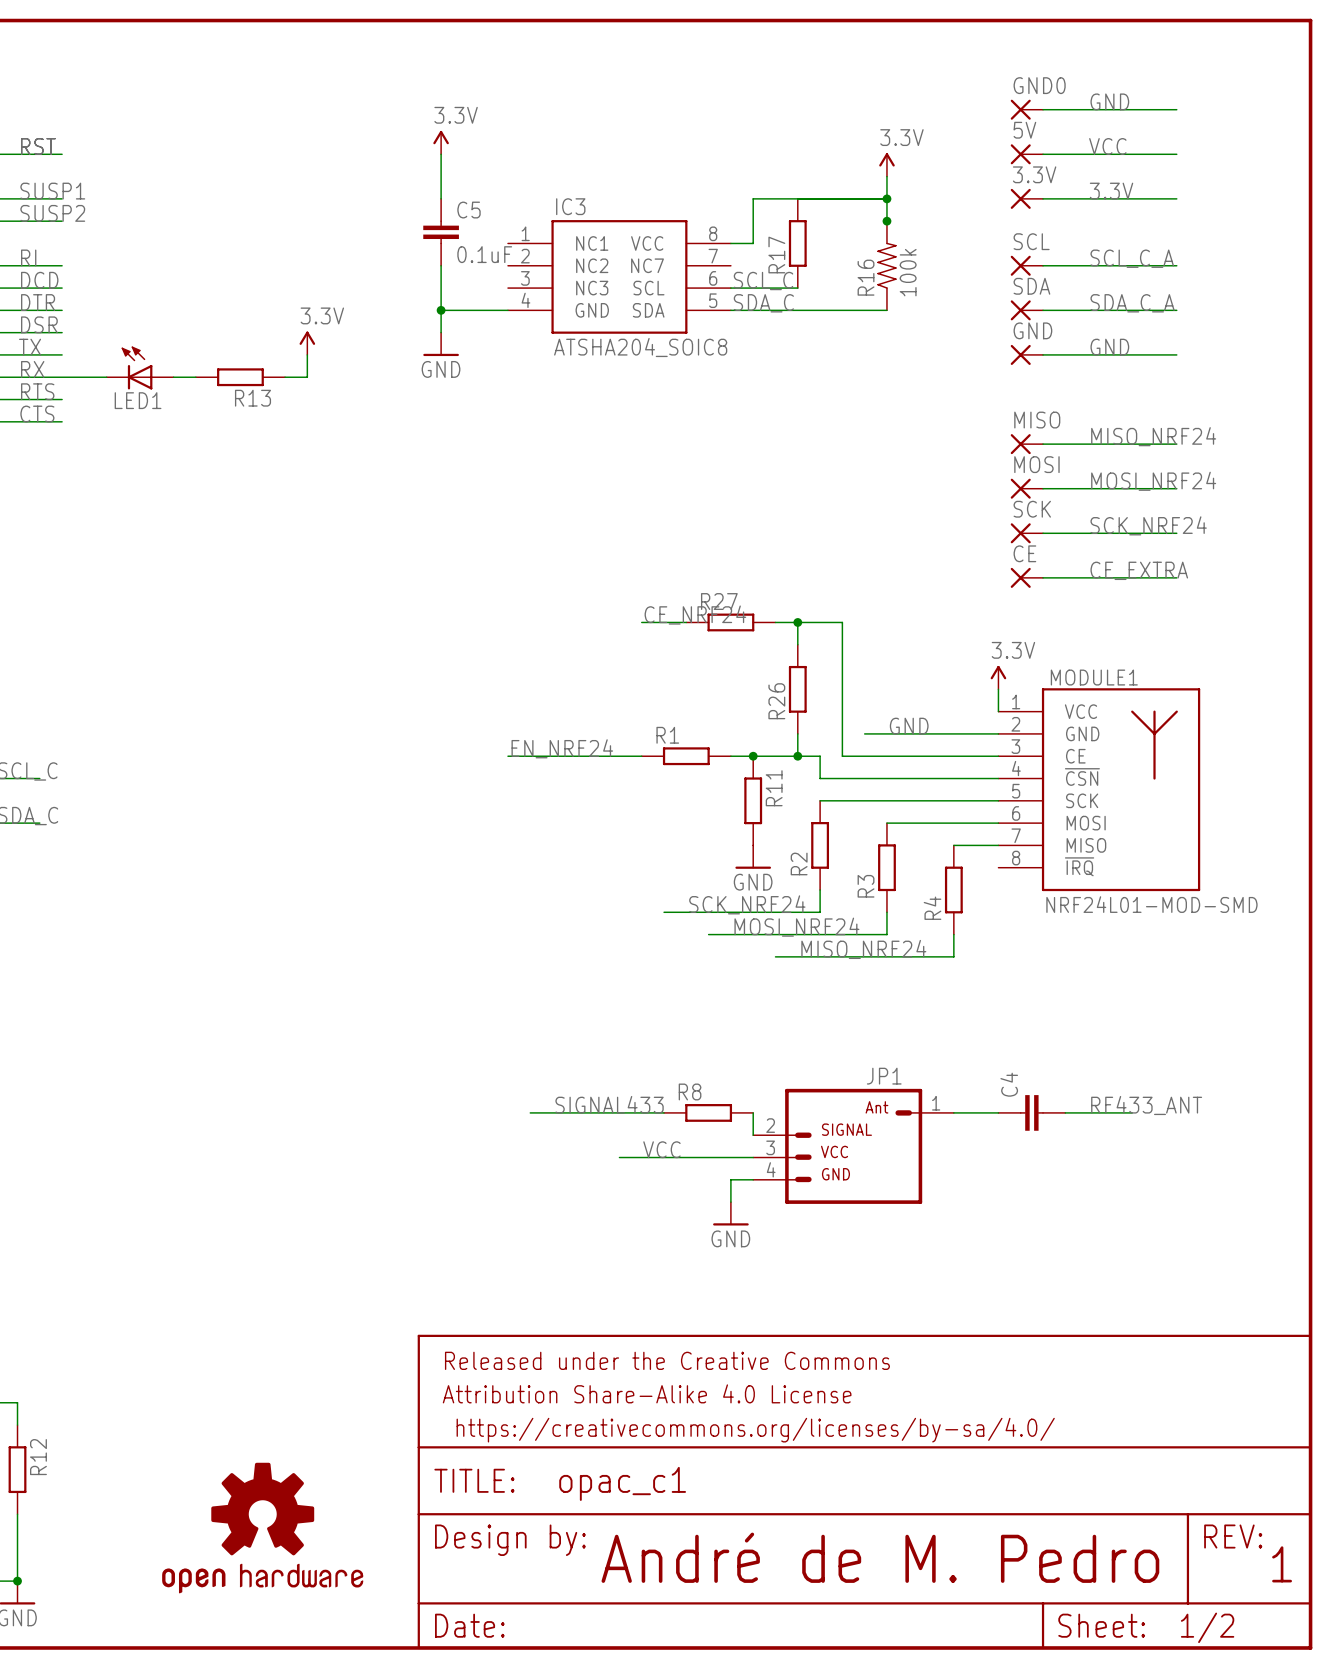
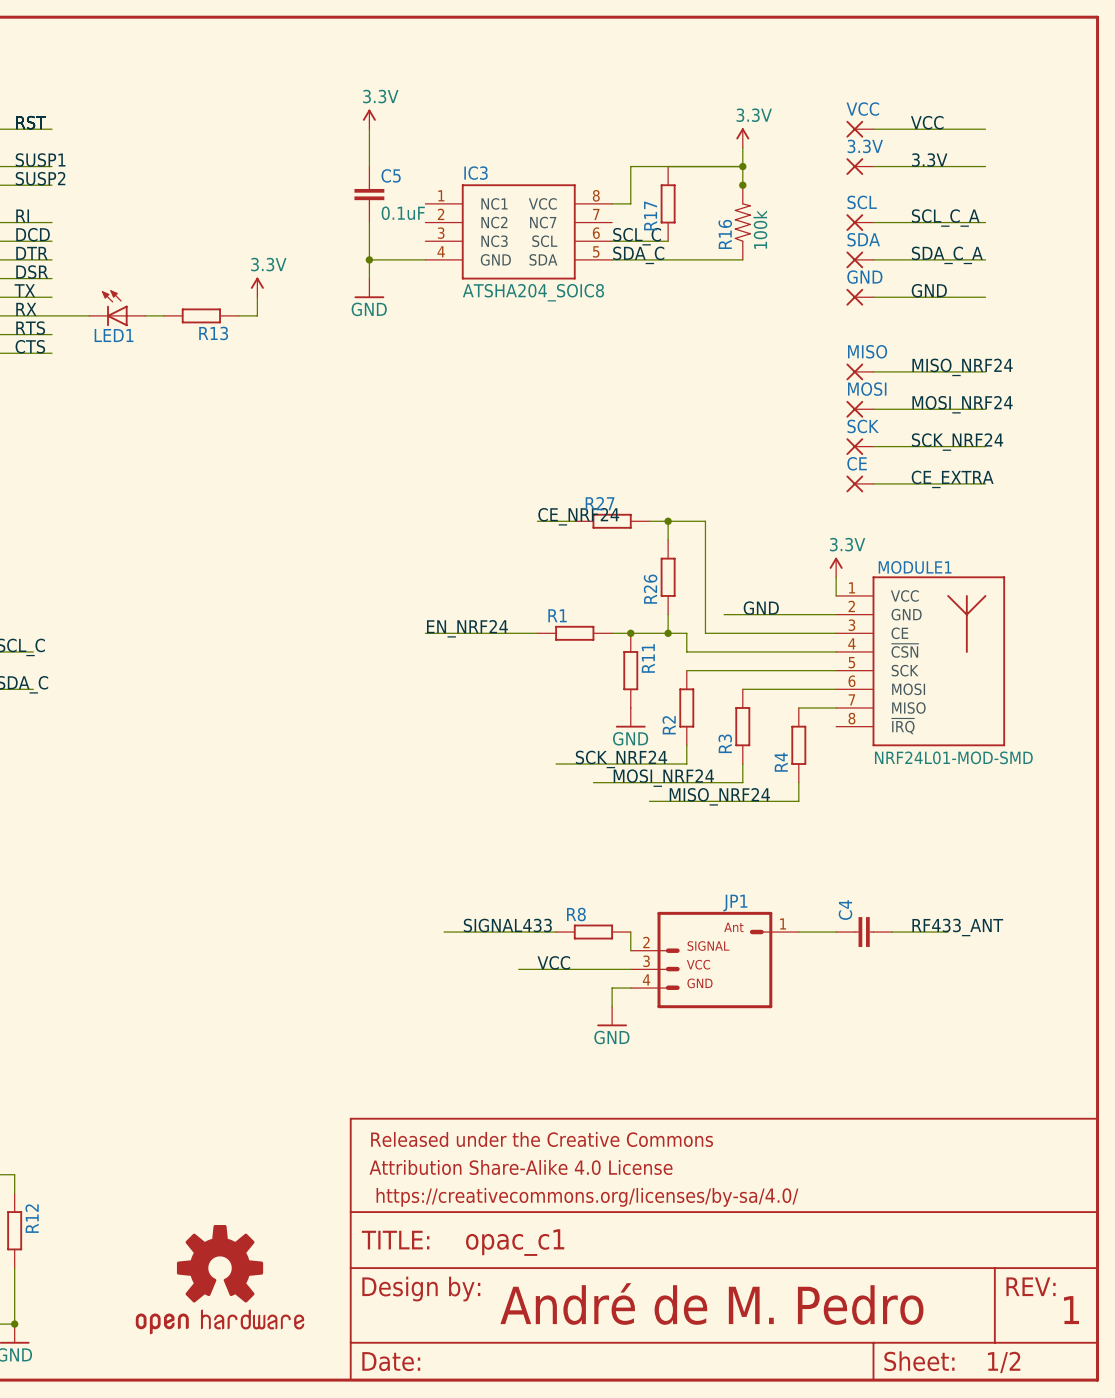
label: GND (1109, 101) -> none
GND0: (1026, 109) -> none
wire: (1043, 109) (1176, 109) -> none
5V name: 5V (1024, 130) -> VCC (862, 109)

